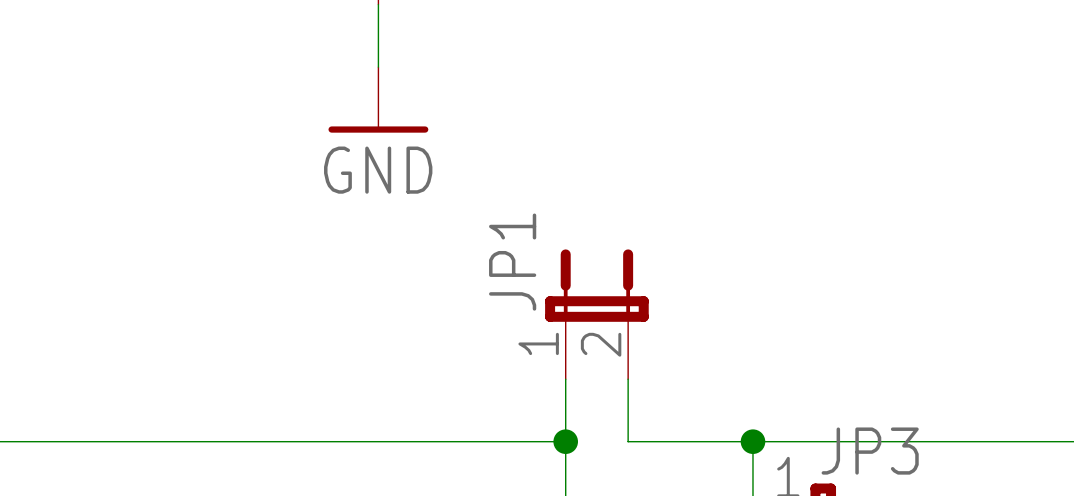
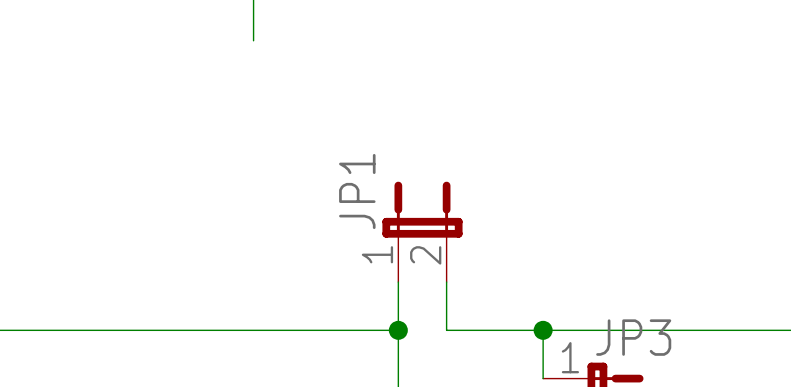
power symbol: GND (378, 99) -> none

